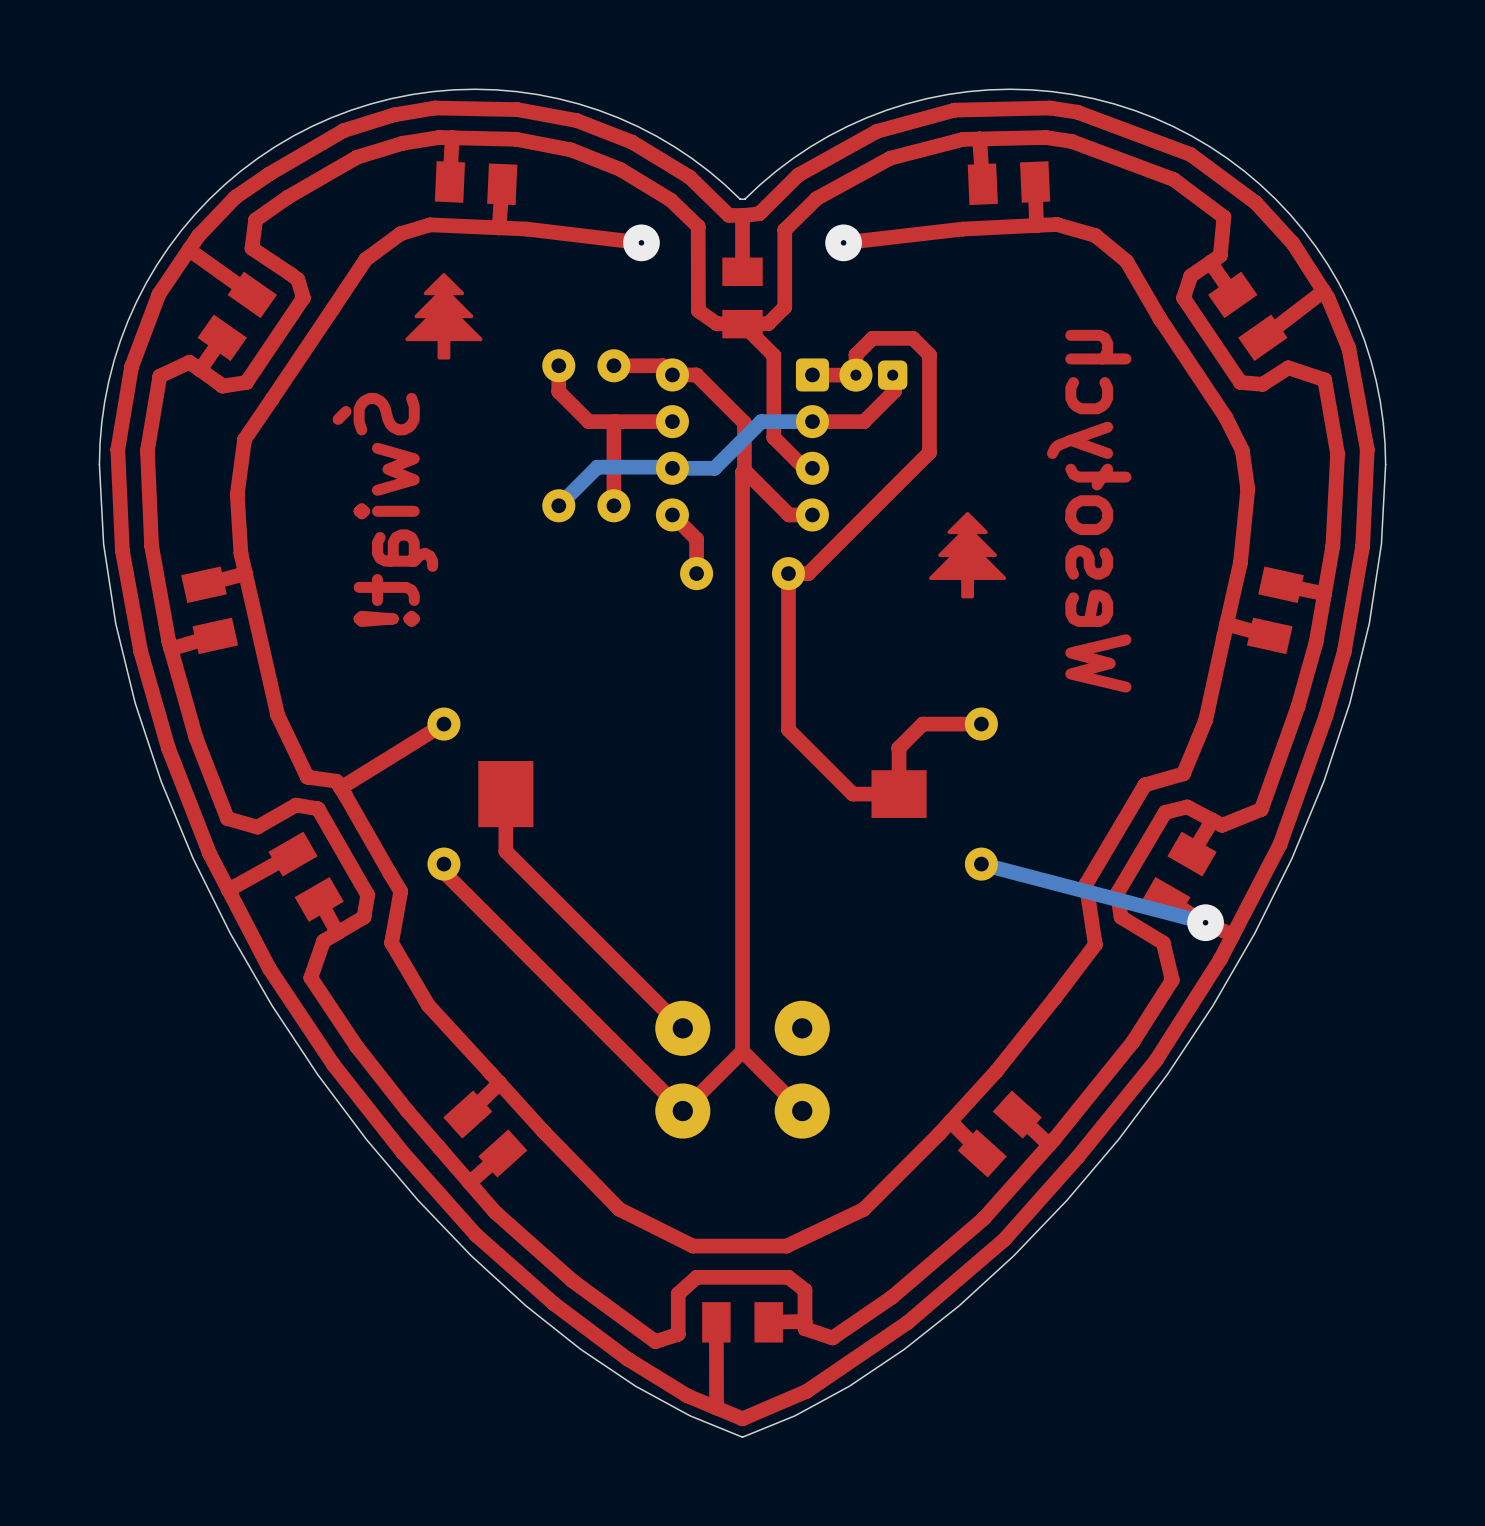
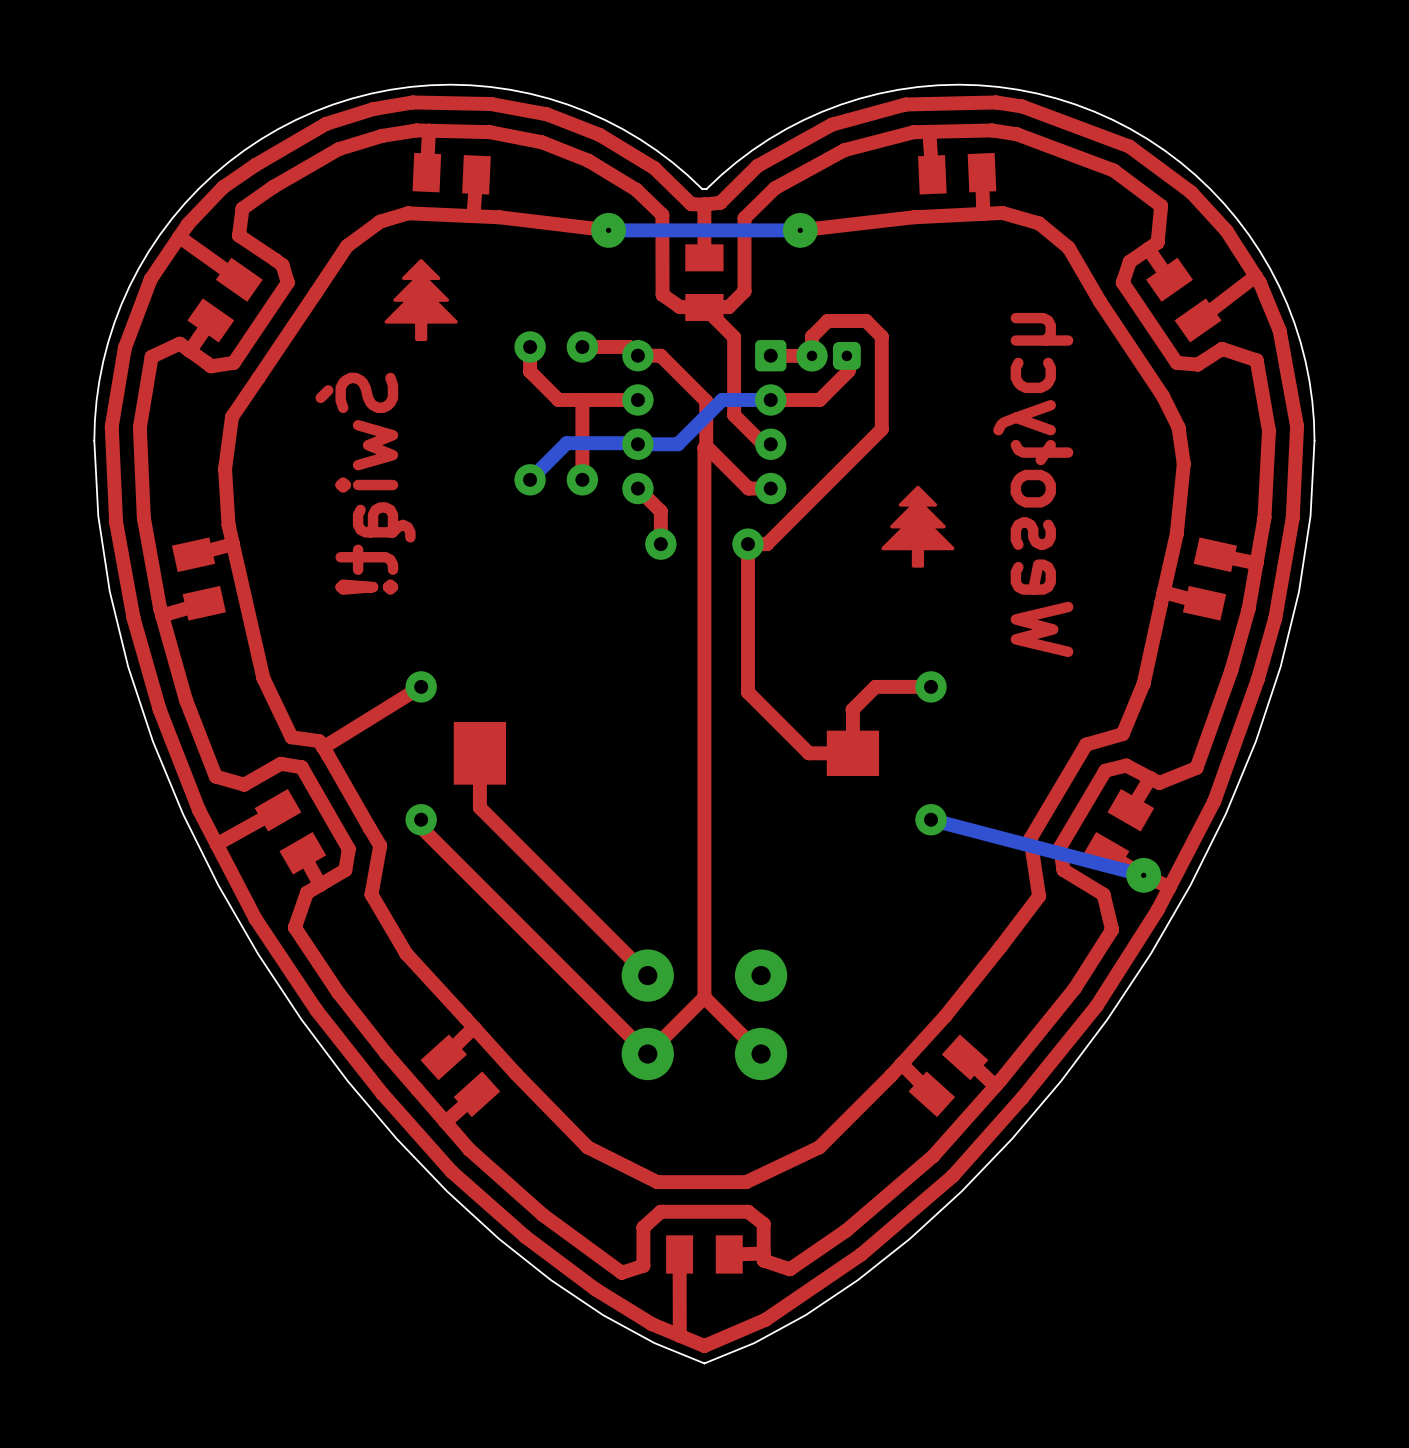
bottom track: none -> (800, 230) (608, 230)

